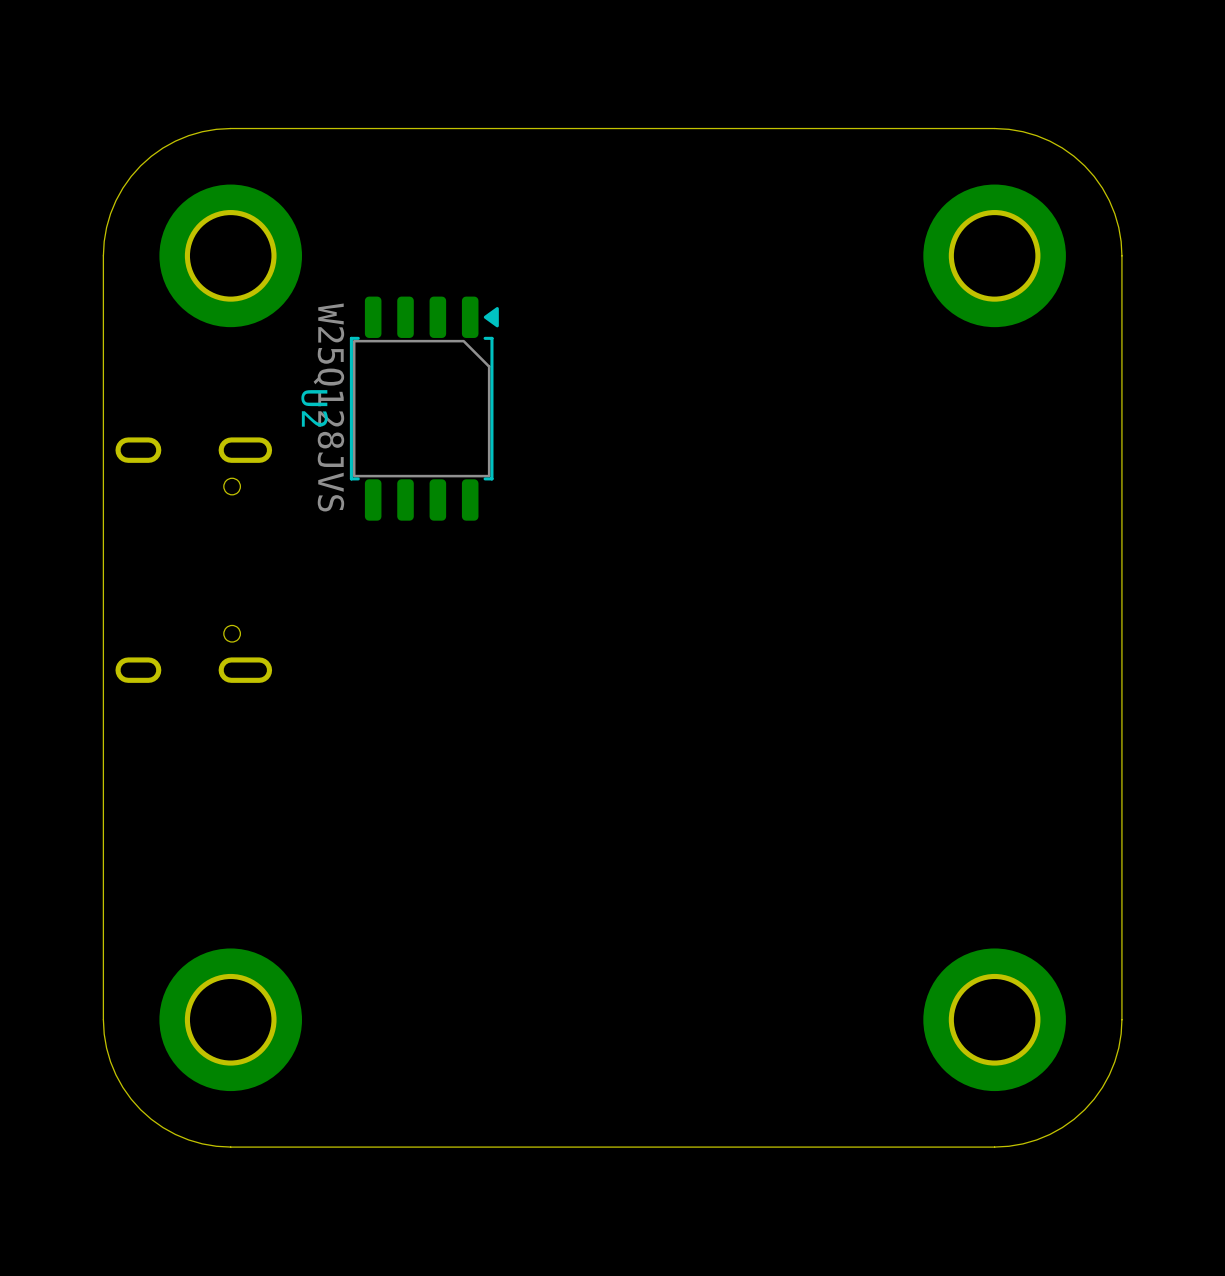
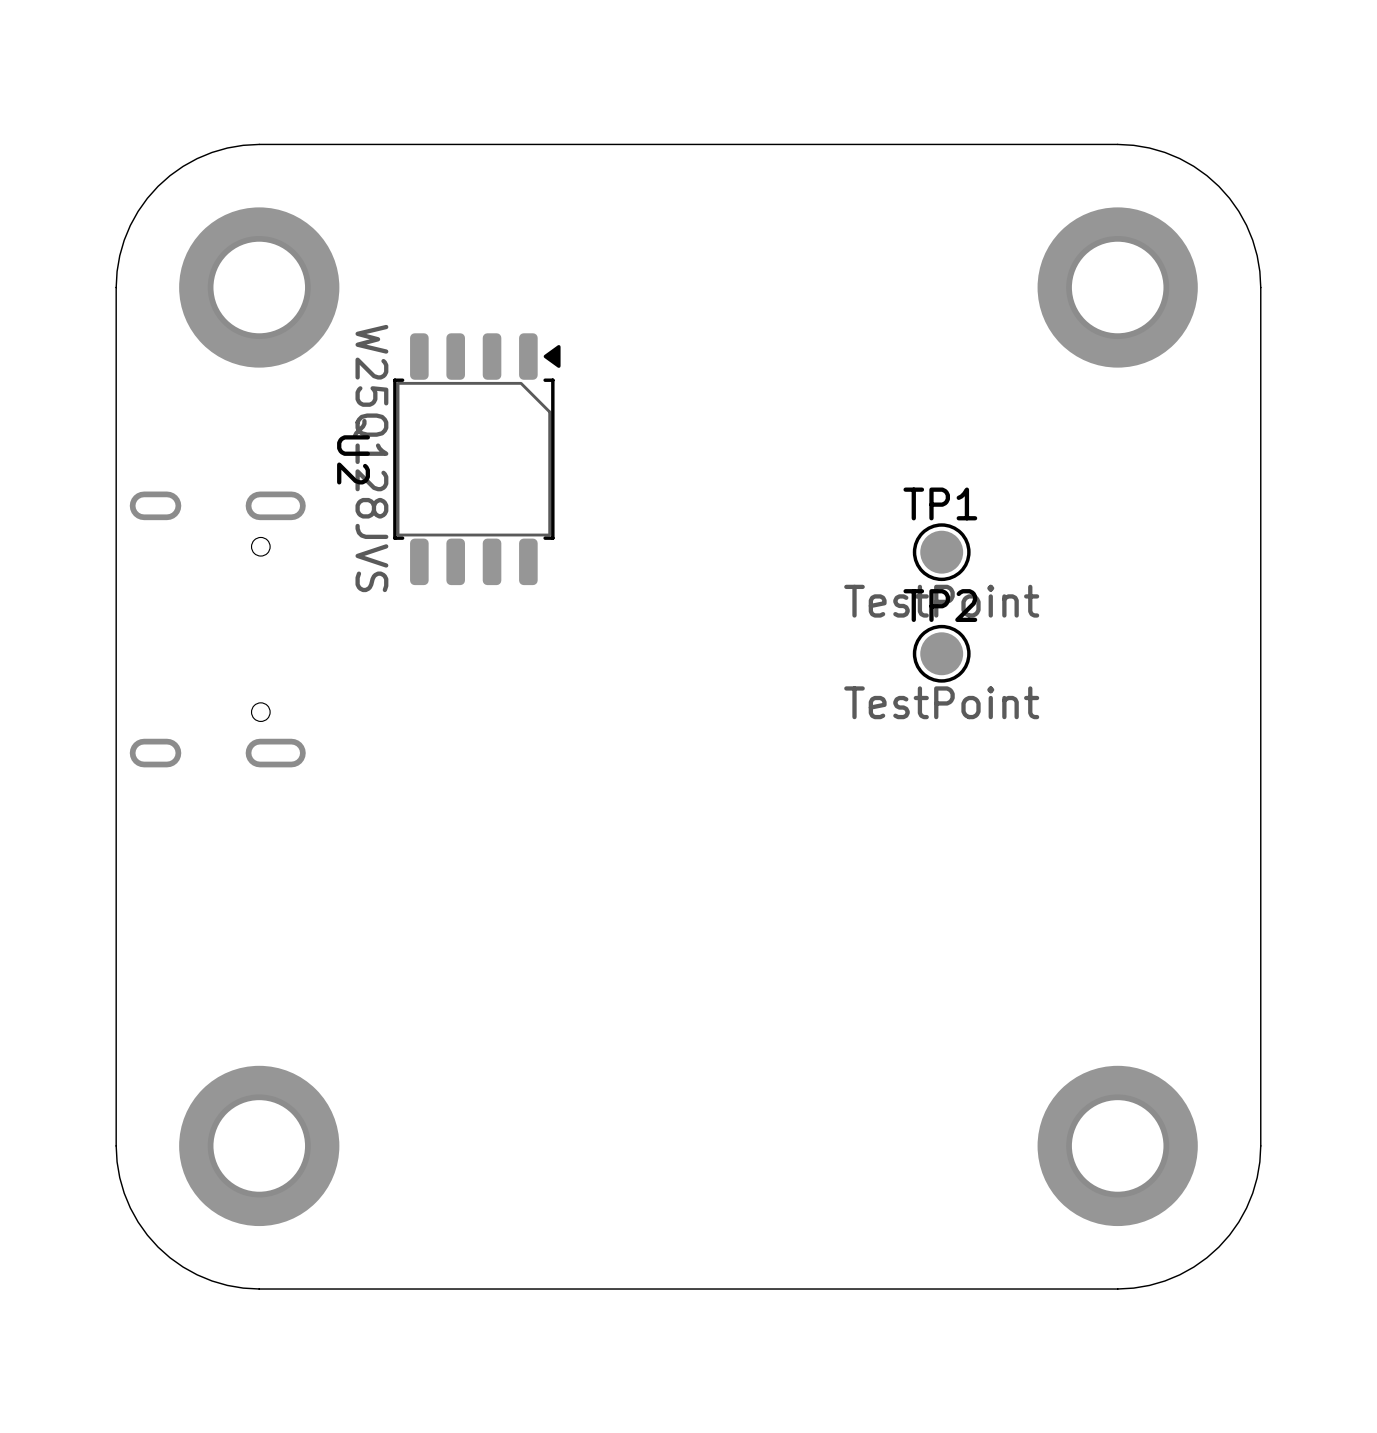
TP1: none -> TestPoint (941, 552)
TP2: none -> TestPoint (941, 653)

